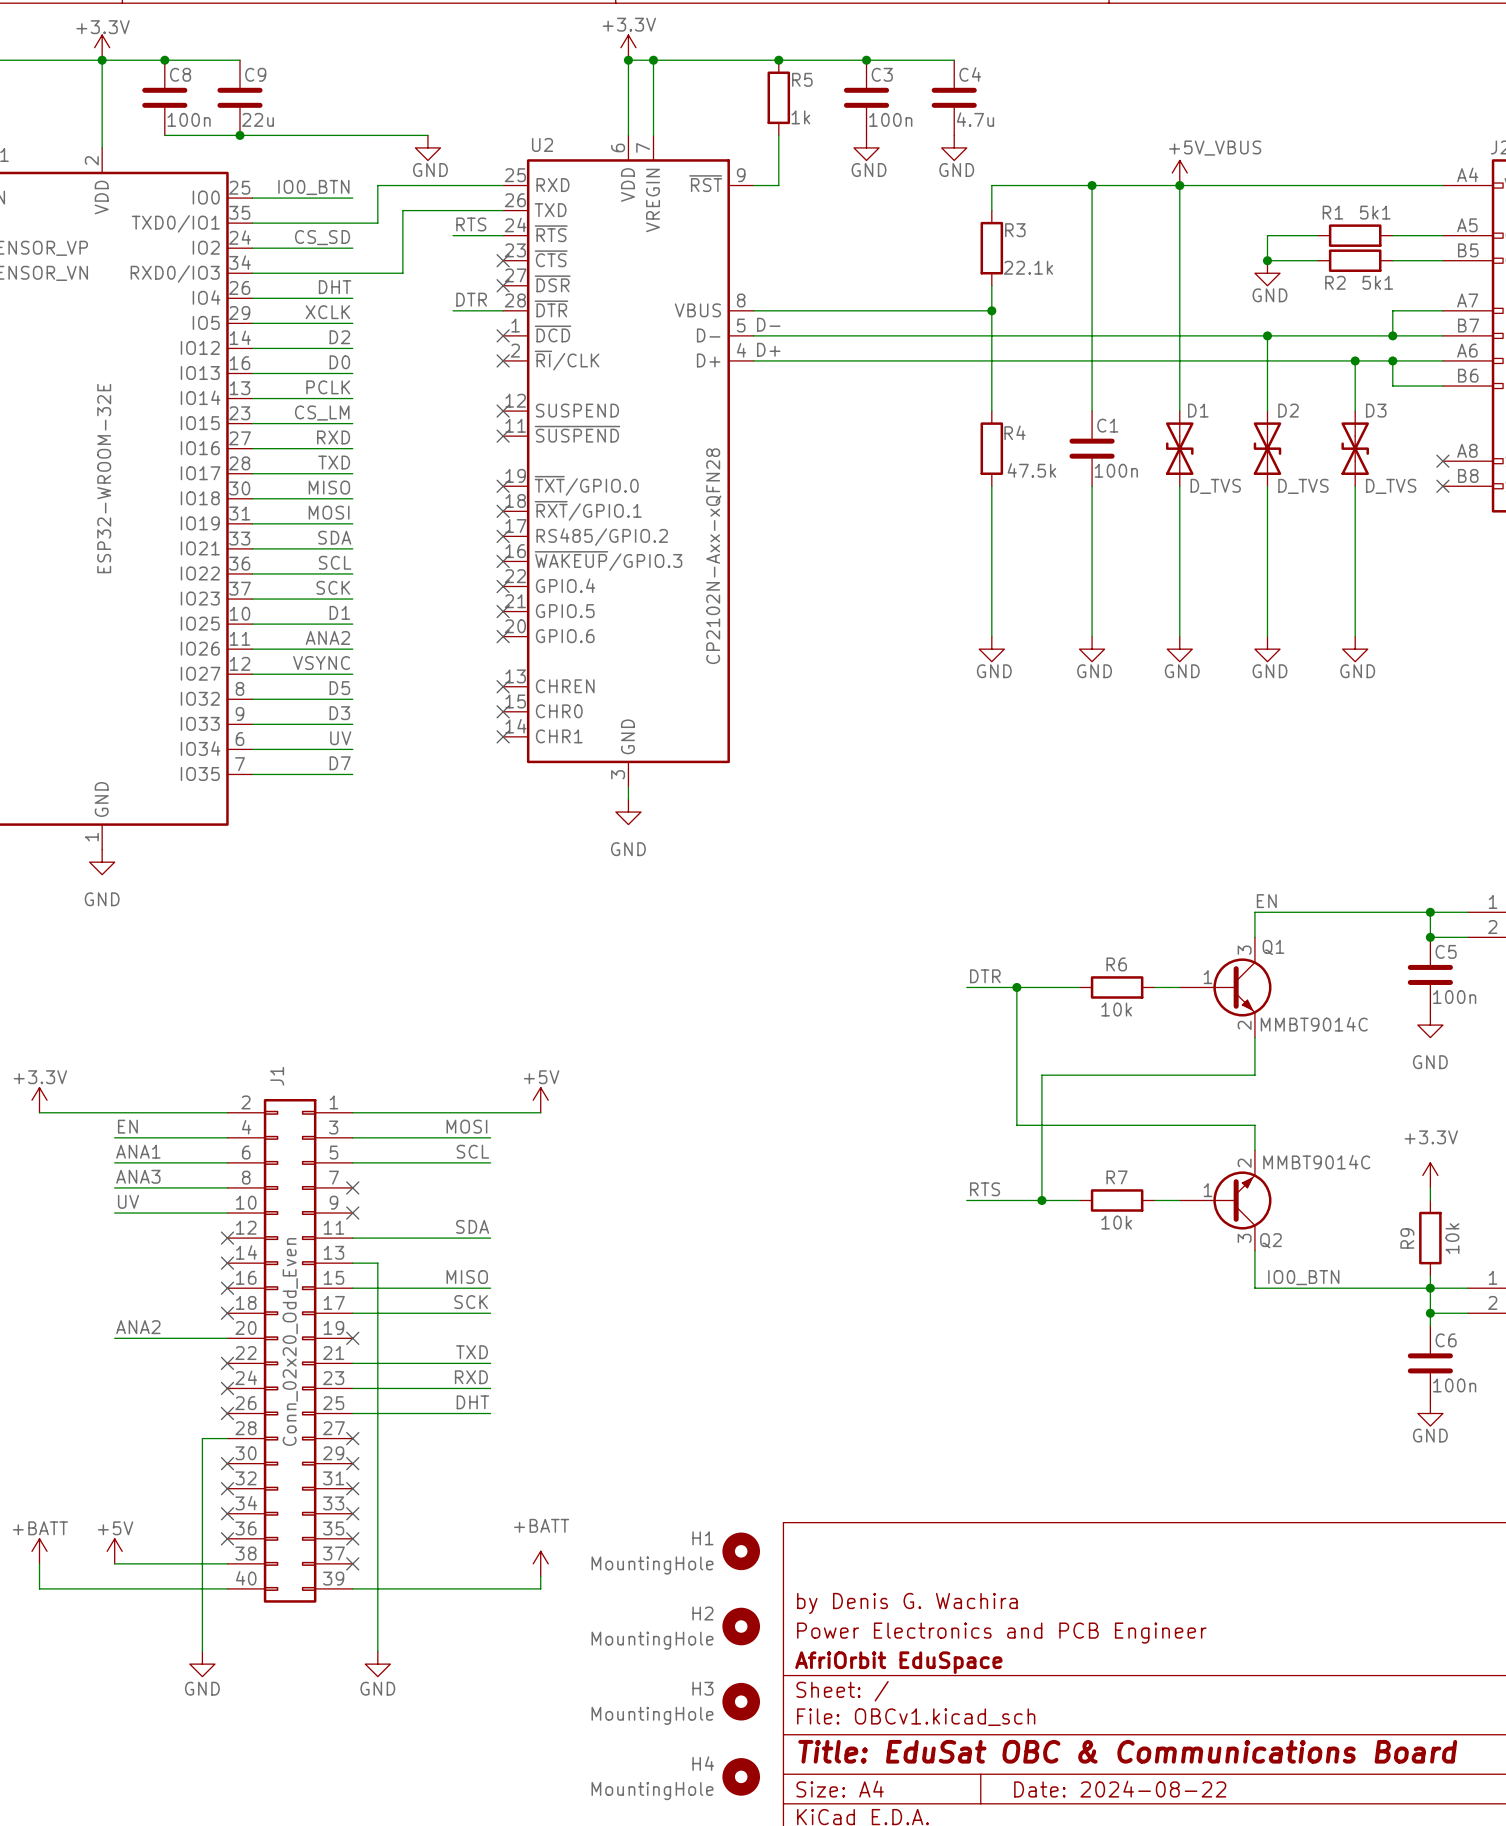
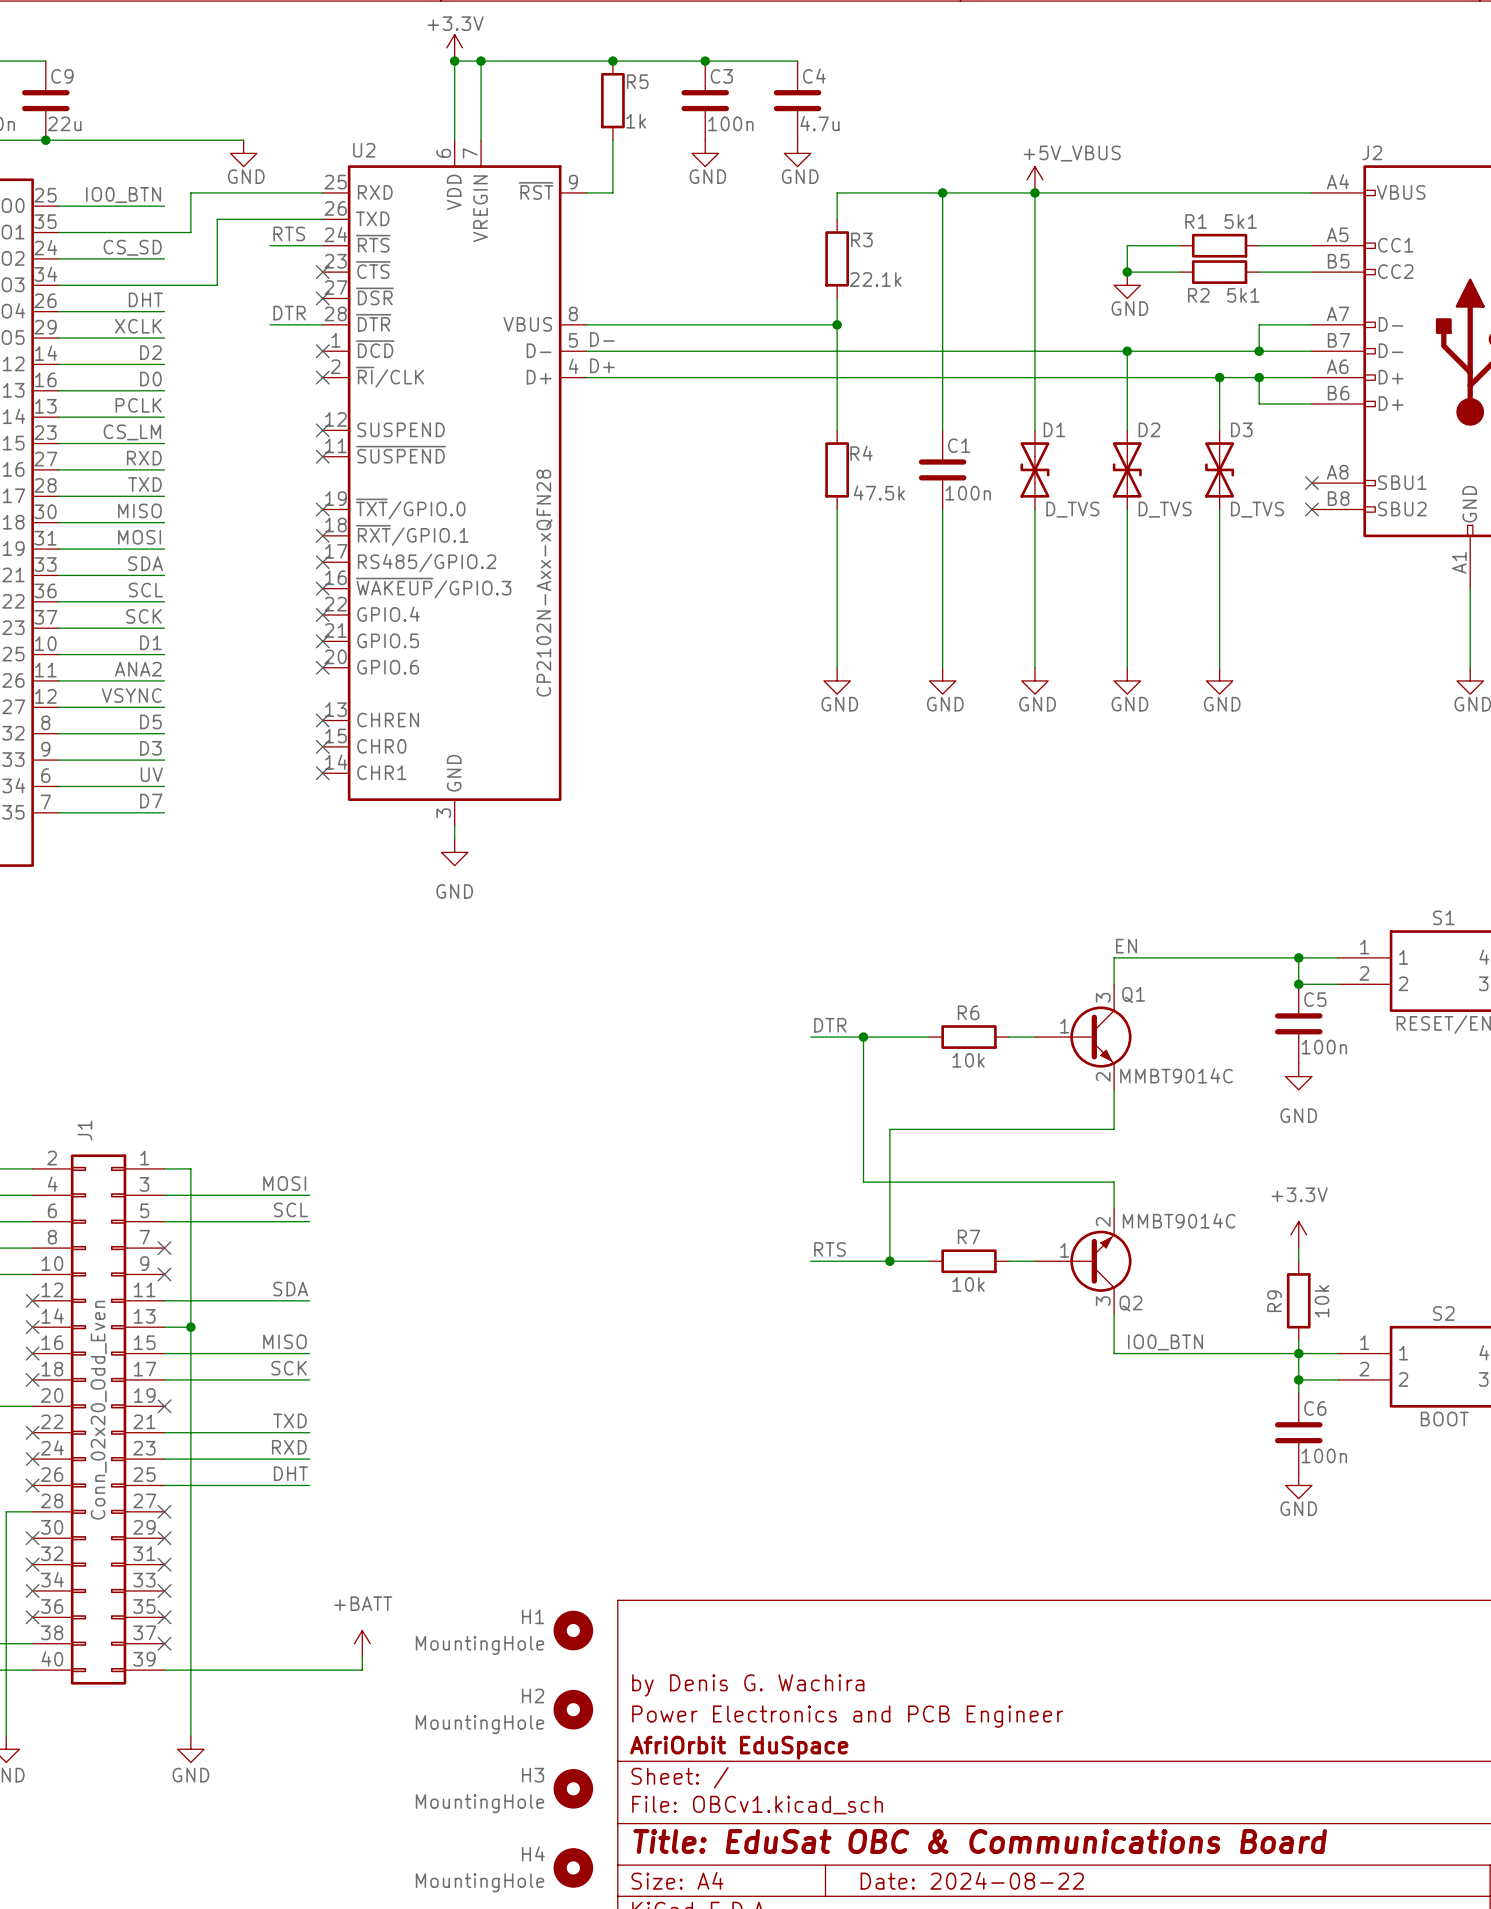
power symbol: +5V (540, 1100) -> none
wire: (377, 1112) (540, 1112) -> (190, 1168) (190, 1327)
junction: none -> (190, 1327)

